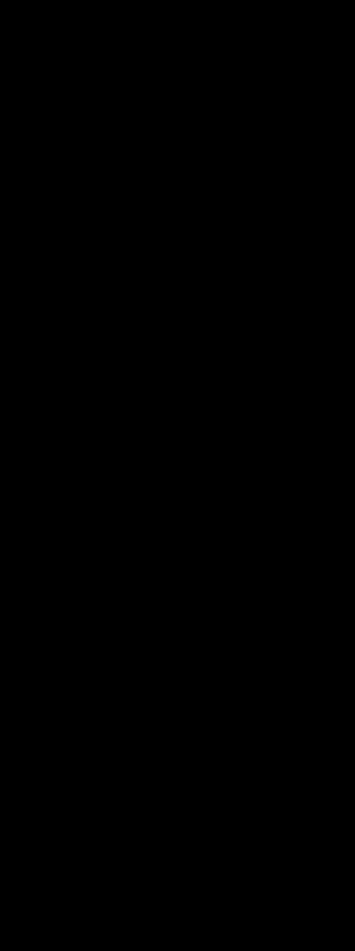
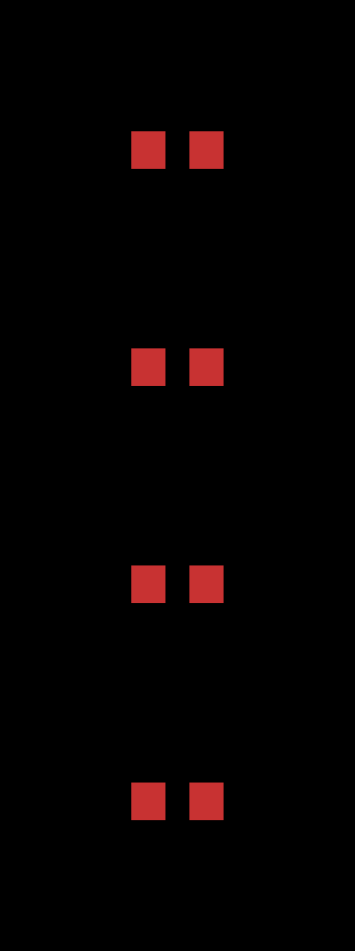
part: none -> (177, 150)
part: none -> (177, 367)
part: none -> (177, 584)
part: none -> (177, 801)

